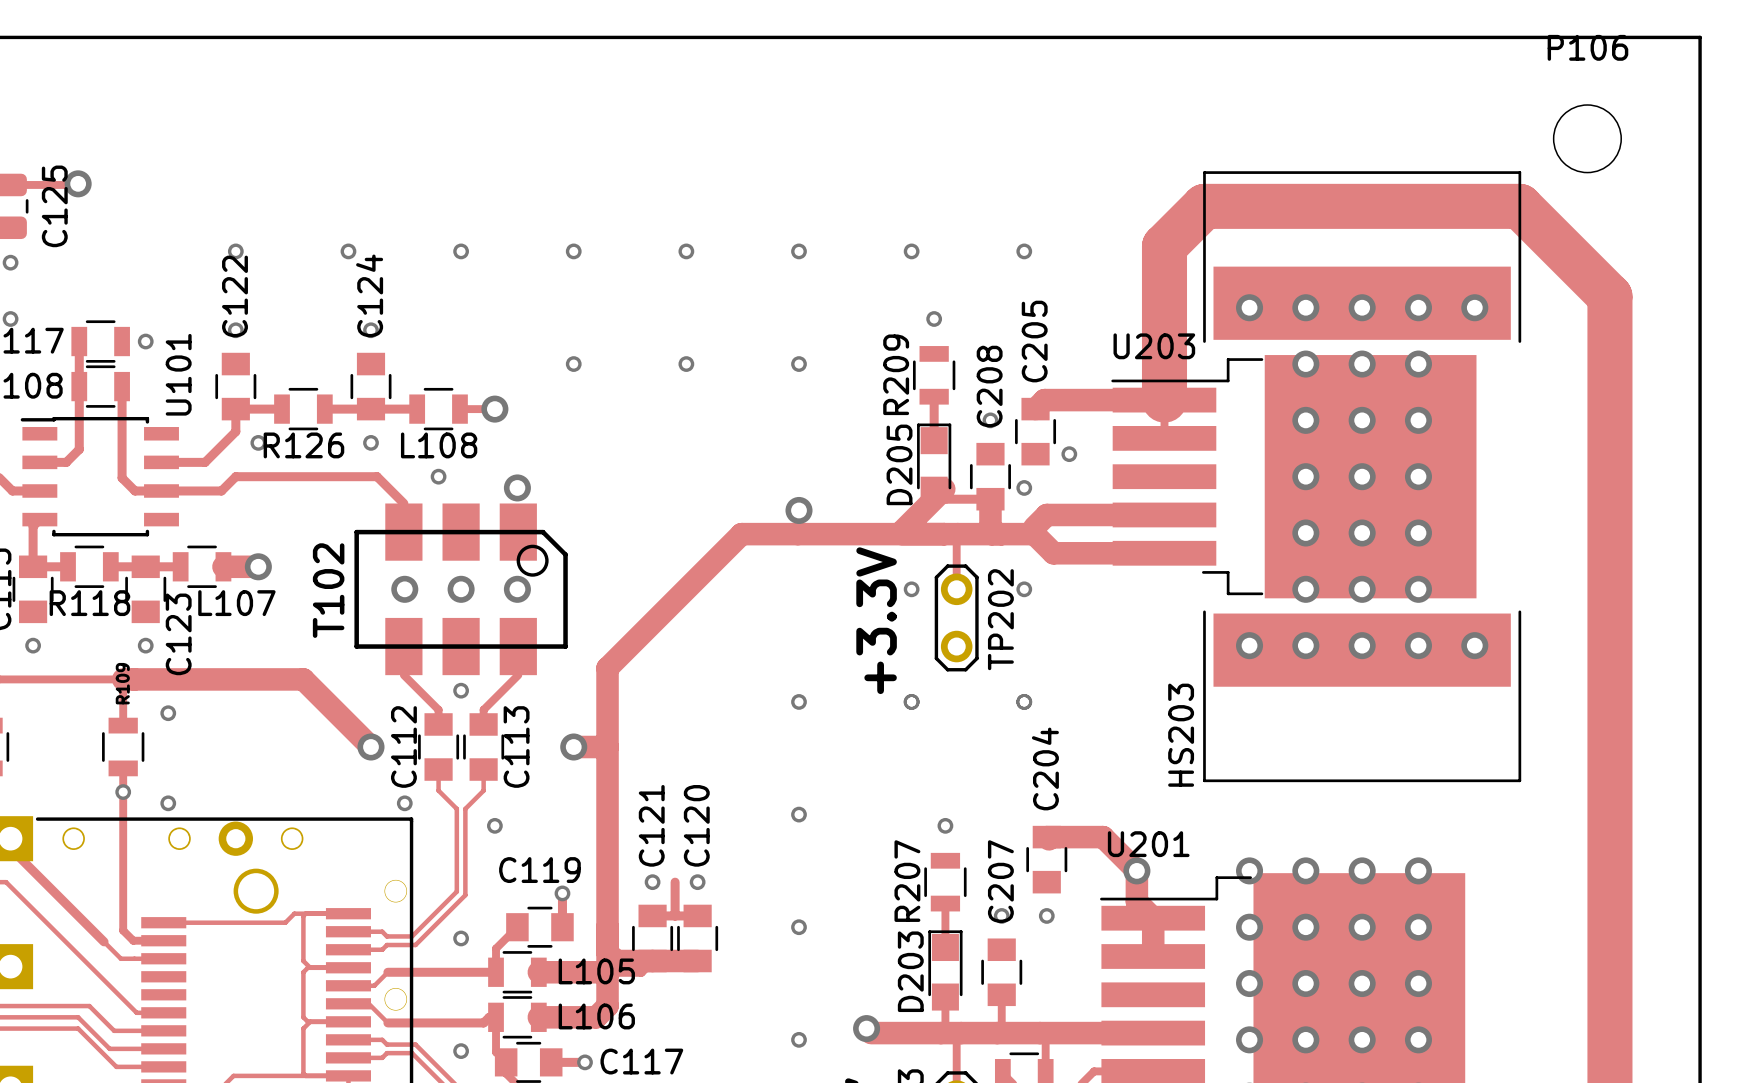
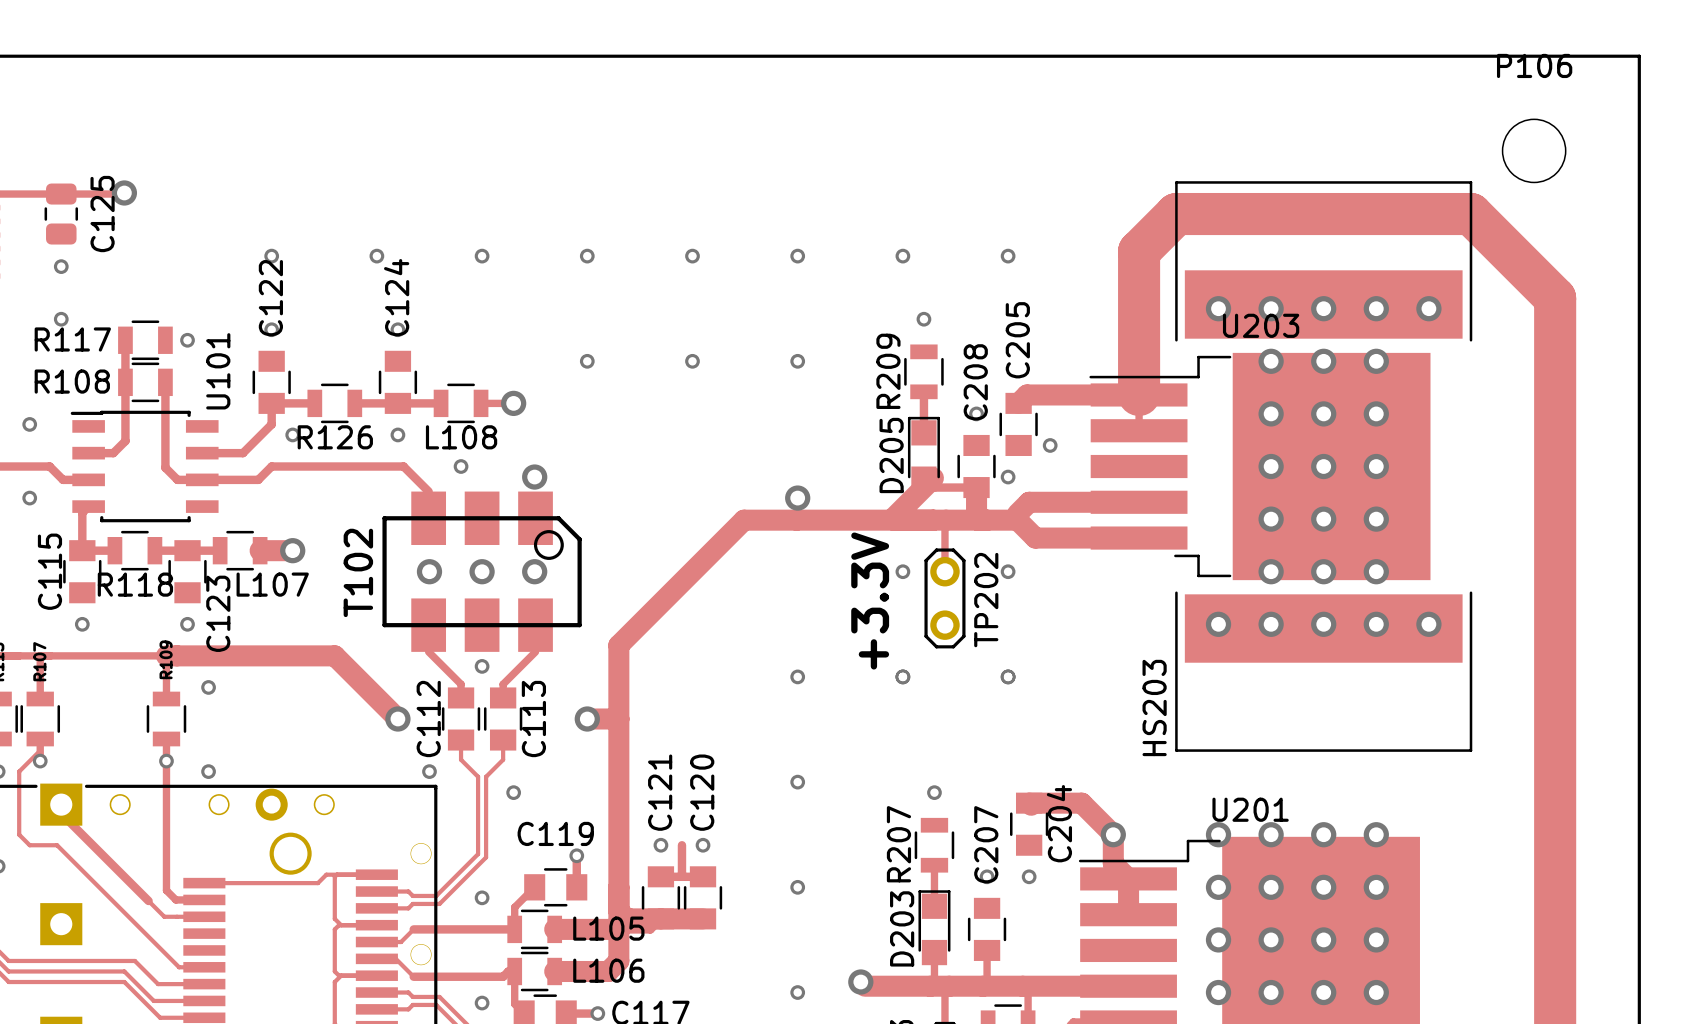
U203 name position: U203 (1154, 346) -> U203 (1261, 325)
C204 name position: C204 (1045, 768) -> C204 (1059, 823)
U201 name position: U201 (1148, 844) -> U201 (1250, 809)

